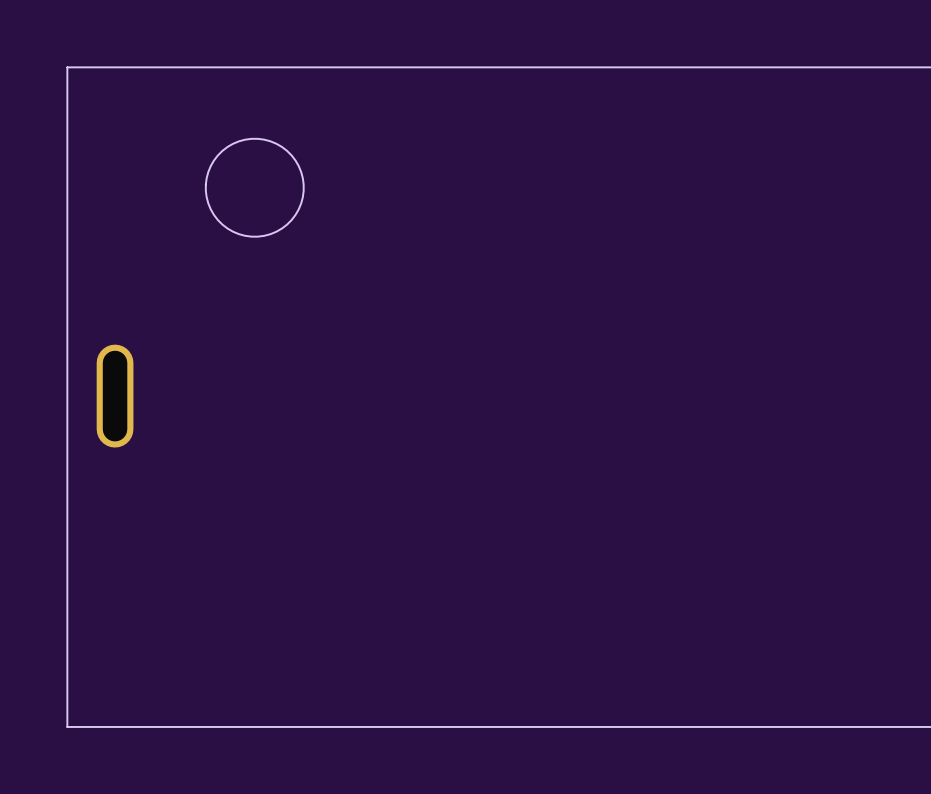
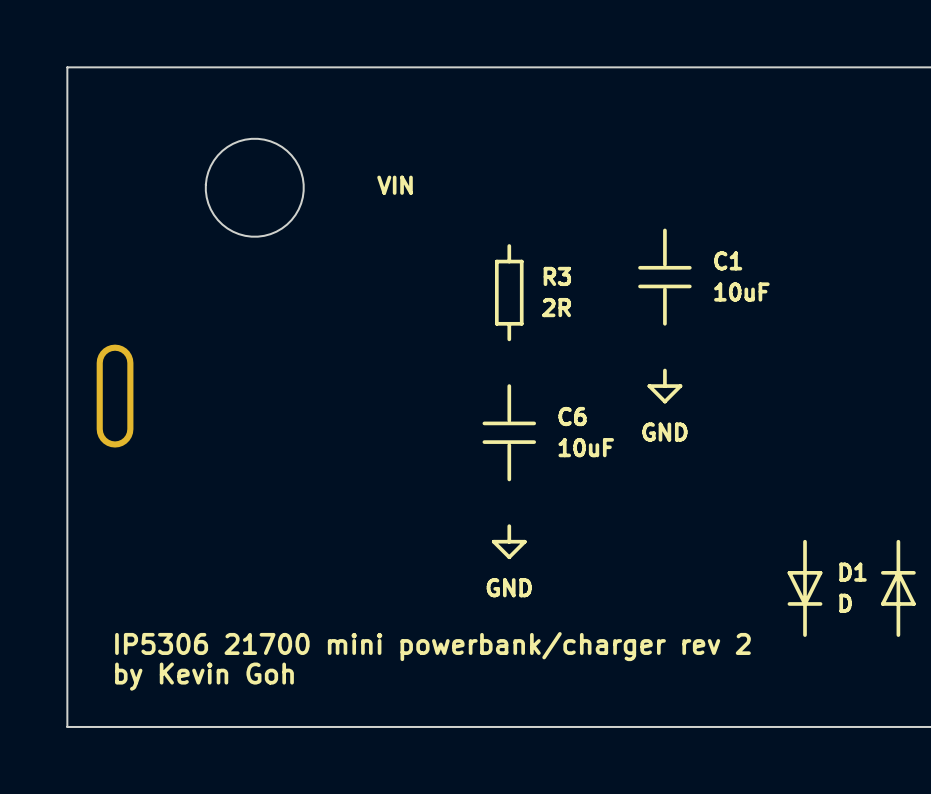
line: none -> (389, 177) (384, 193) (379, 177)
line: none -> (394, 177) (394, 193)
line: none -> (410, 177) (410, 193) (402, 177) (402, 193)
line: none -> (664, 230) (664, 264)
line: none -> (509, 245) (509, 261)
line: none -> (725, 254) (718, 253) (715, 259) (718, 267) (725, 267)
line: none -> (731, 257) (735, 253) (735, 268)
line: none -> (521, 261) (496, 261) (496, 323) (521, 323) (521, 261)
line: none -> (689, 267) (640, 267)
line: none -> (559, 268) (569, 268) (564, 274) (568, 276) (568, 282) (559, 282)
line: none -> (740, 268) (731, 268)
line: none -> (545, 276) (551, 276) (552, 276) (553, 270) (545, 268) (545, 284)
line: none -> (549, 276) (554, 284)
line: none -> (735, 284) (732, 285) (730, 290) (731, 296) (734, 299) (738, 298) (739, 293) (738, 287) (735, 284)
line: none -> (767, 284) (760, 284) (760, 299)
line: none -> (689, 286) (640, 286)
line: none -> (715, 288) (720, 284) (720, 299)
line: none -> (664, 289) (664, 323)
line: none -> (746, 289) (747, 299) (753, 298)
line: none -> (753, 289) (753, 299)
line: none -> (765, 291) (760, 291)
line: none -> (724, 299) (715, 299)
line: none -> (544, 301) (550, 299) (553, 304) (544, 315) (553, 315)
line: none -> (560, 307) (566, 307) (567, 307) (568, 301) (560, 299) (560, 315)
line: none -> (564, 307) (569, 315)
line: none -> (509, 323) (509, 339)
line: none -> (664, 370) (664, 386)
line: none -> (509, 386) (509, 420)
line: none -> (680, 386) (664, 401) (649, 386) (680, 386)
line: none -> (583, 408) (578, 409) (576, 412) (575, 415) (575, 421) (578, 424) (584, 422) (583, 415) (578, 414) (576, 416) (575, 417)
line: none -> (569, 410) (563, 409) (560, 415) (563, 423) (569, 422)
line: none -> (534, 423) (484, 423)
line: none -> (669, 424) (669, 439) (660, 424) (660, 439)
line: none -> (680, 424) (676, 424) (676, 439) (682, 439) (685, 433) (684, 426) (680, 424)
line: none -> (653, 425) (647, 425) (644, 428) (644, 433) (647, 439) (653, 438) (653, 433) (650, 433)
line: none -> (580, 439) (578, 439) (576, 441) (575, 445) (575, 452) (578, 455) (582, 453) (584, 449) (583, 442) (581, 440) (580, 439)
line: none -> (612, 439) (604, 439) (604, 455)
line: none -> (534, 442) (484, 442)
line: none -> (560, 444) (564, 439) (564, 455)
line: none -> (509, 445) (509, 479)
line: none -> (590, 445) (591, 454) (597, 453)
line: none -> (597, 445) (597, 455)
line: none -> (609, 447) (604, 447)
line: none -> (569, 455) (560, 455)
line: none -> (509, 526) (509, 541)
line: none -> (524, 541) (493, 541) (509, 557) (524, 541)
line: none -> (805, 541) (805, 635)
line: none -> (898, 541) (898, 635)
line: none -> (844, 564) (841, 564) (841, 579) (847, 579) (850, 573) (848, 566) (844, 564)
line: none -> (856, 568) (860, 564) (860, 579)
line: none -> (820, 572) (789, 572) (805, 603) (820, 572)
line: none -> (898, 572) (882, 603) (913, 603) (898, 572)
line: none -> (913, 572) (882, 572)
line: none -> (513, 579) (513, 595) (504, 579) (504, 595)
line: none -> (524, 579) (521, 579) (521, 595) (527, 594) (530, 588) (528, 582) (524, 579)
line: none -> (864, 579) (856, 579)
line: none -> (497, 580) (491, 580) (489, 583) (488, 588) (491, 594) (498, 594) (498, 588) (495, 588)
line: none -> (844, 595) (848, 597) (850, 604) (847, 610) (841, 611) (841, 595) (844, 595)
line: none -> (820, 603) (789, 603)
text: none -> IP5306 21700 mini powerbank/charger rev 2 (432, 646)
text: none -> by Kevin Goh (204, 676)

